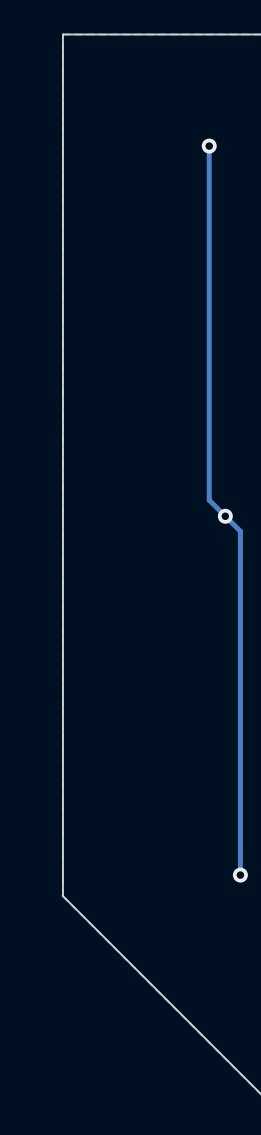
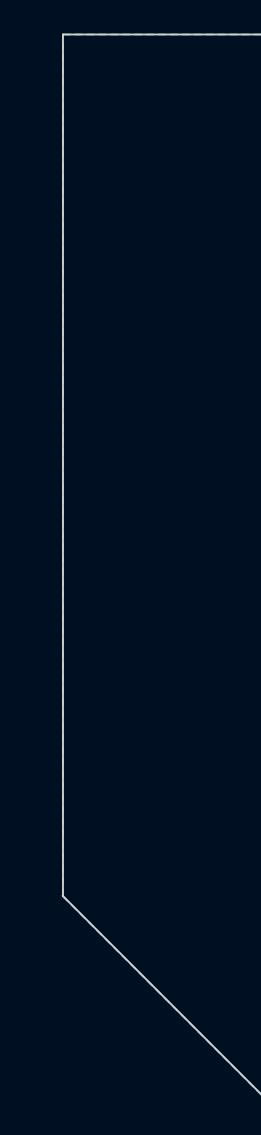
track: (209, 146) (209, 500) (240, 531) (240, 875) -> none
via: (209, 146) -> none
via: (225, 516) -> none
via: (240, 875) -> none

